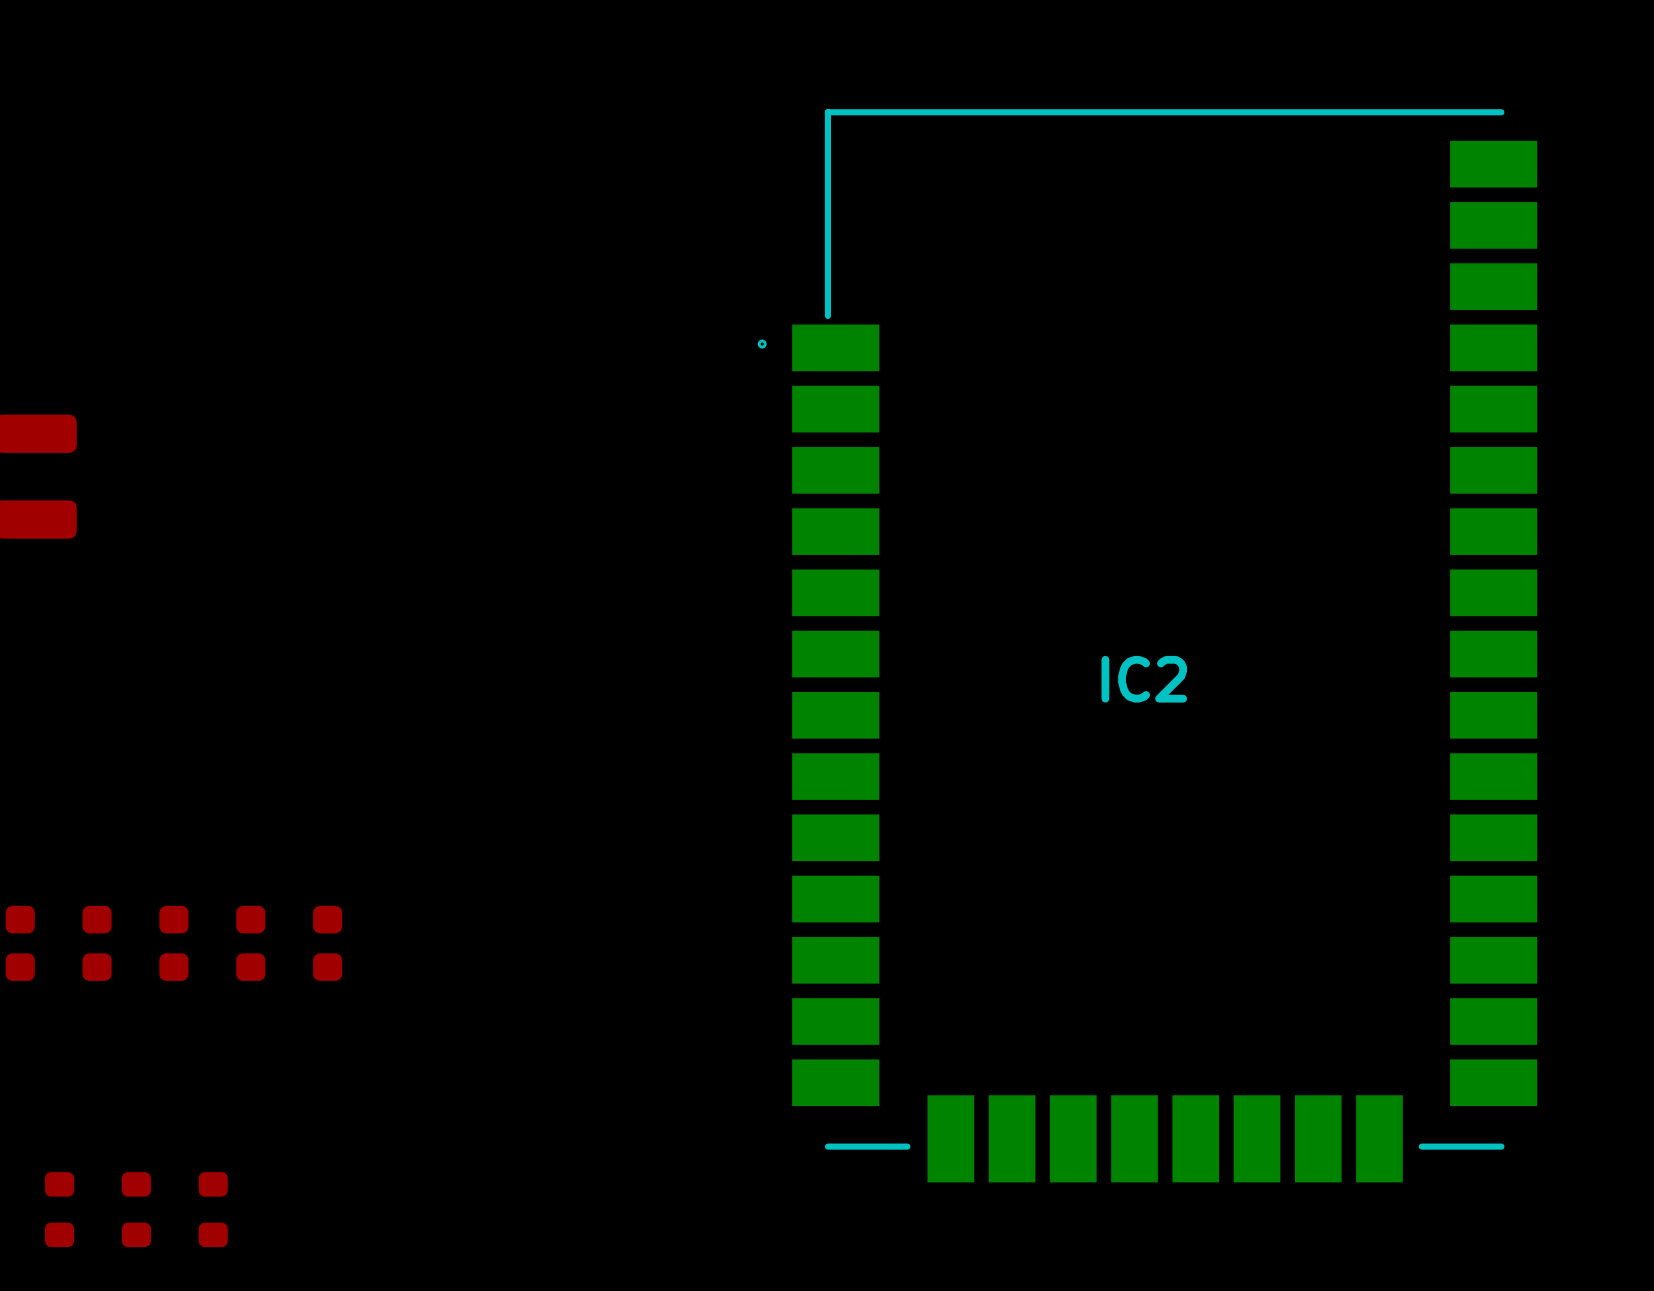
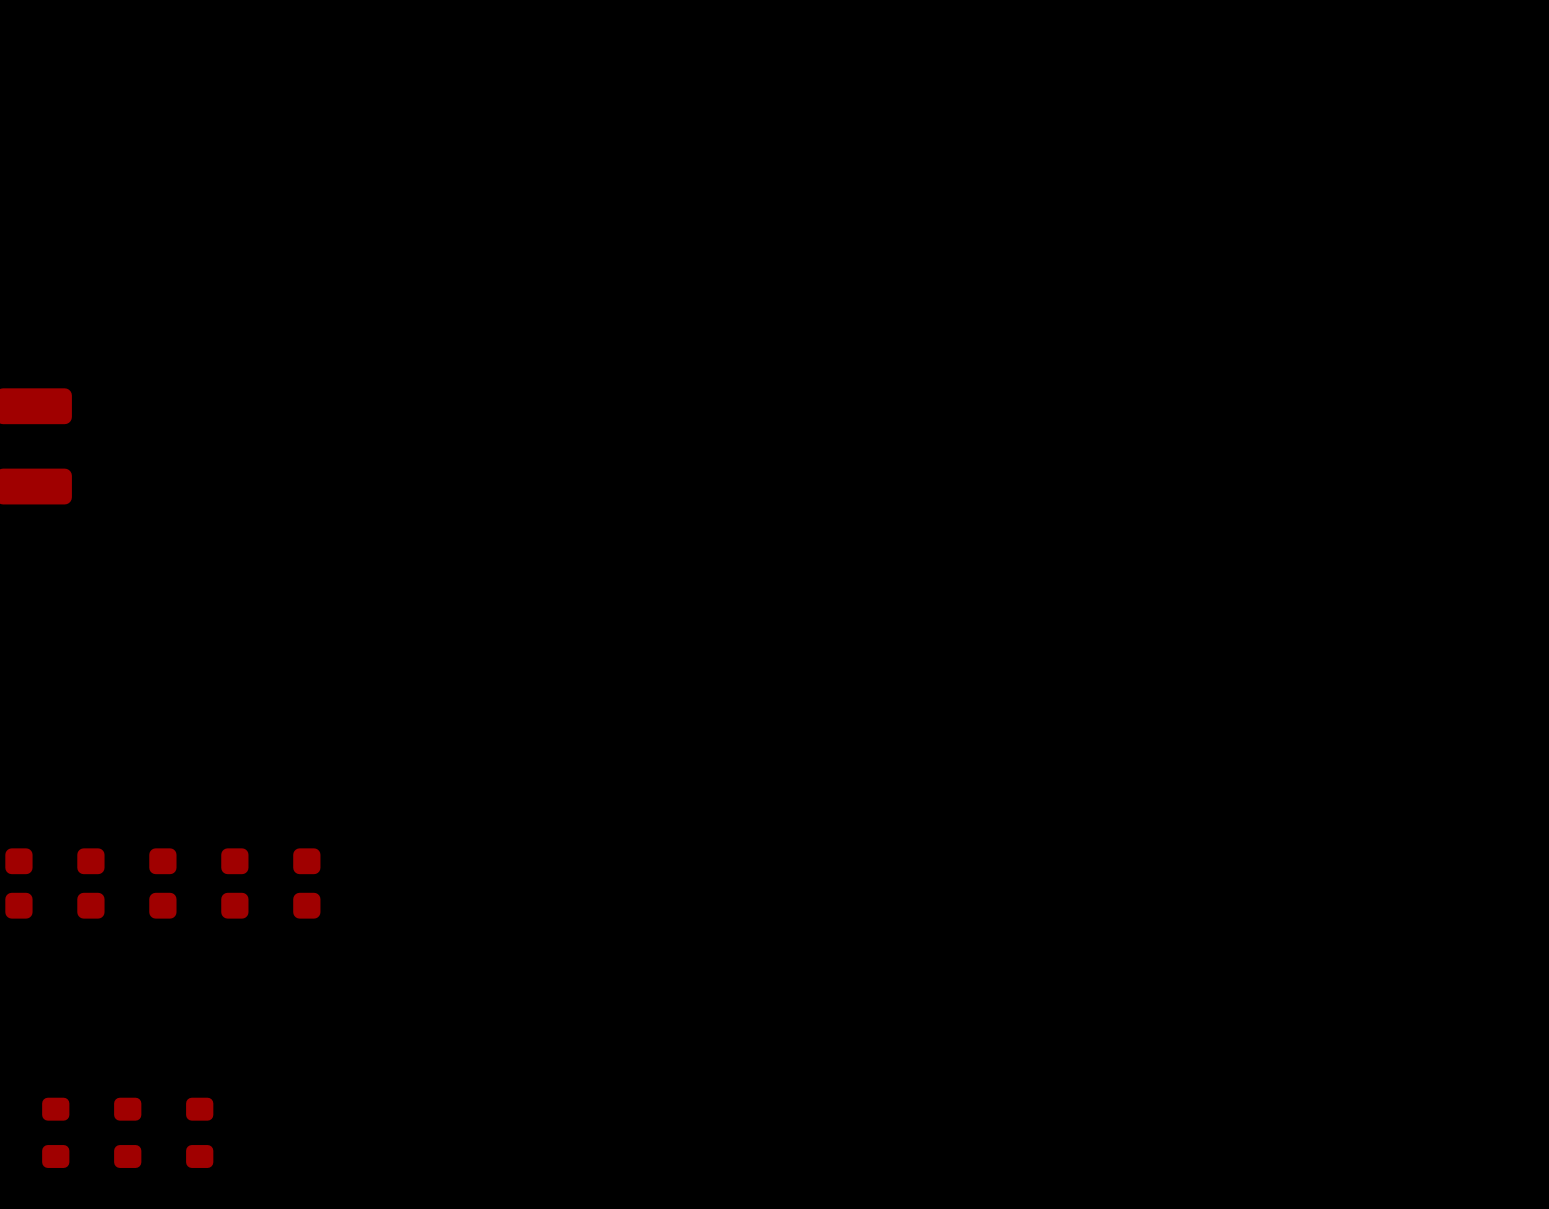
IC2: (1147, 645) -> none

